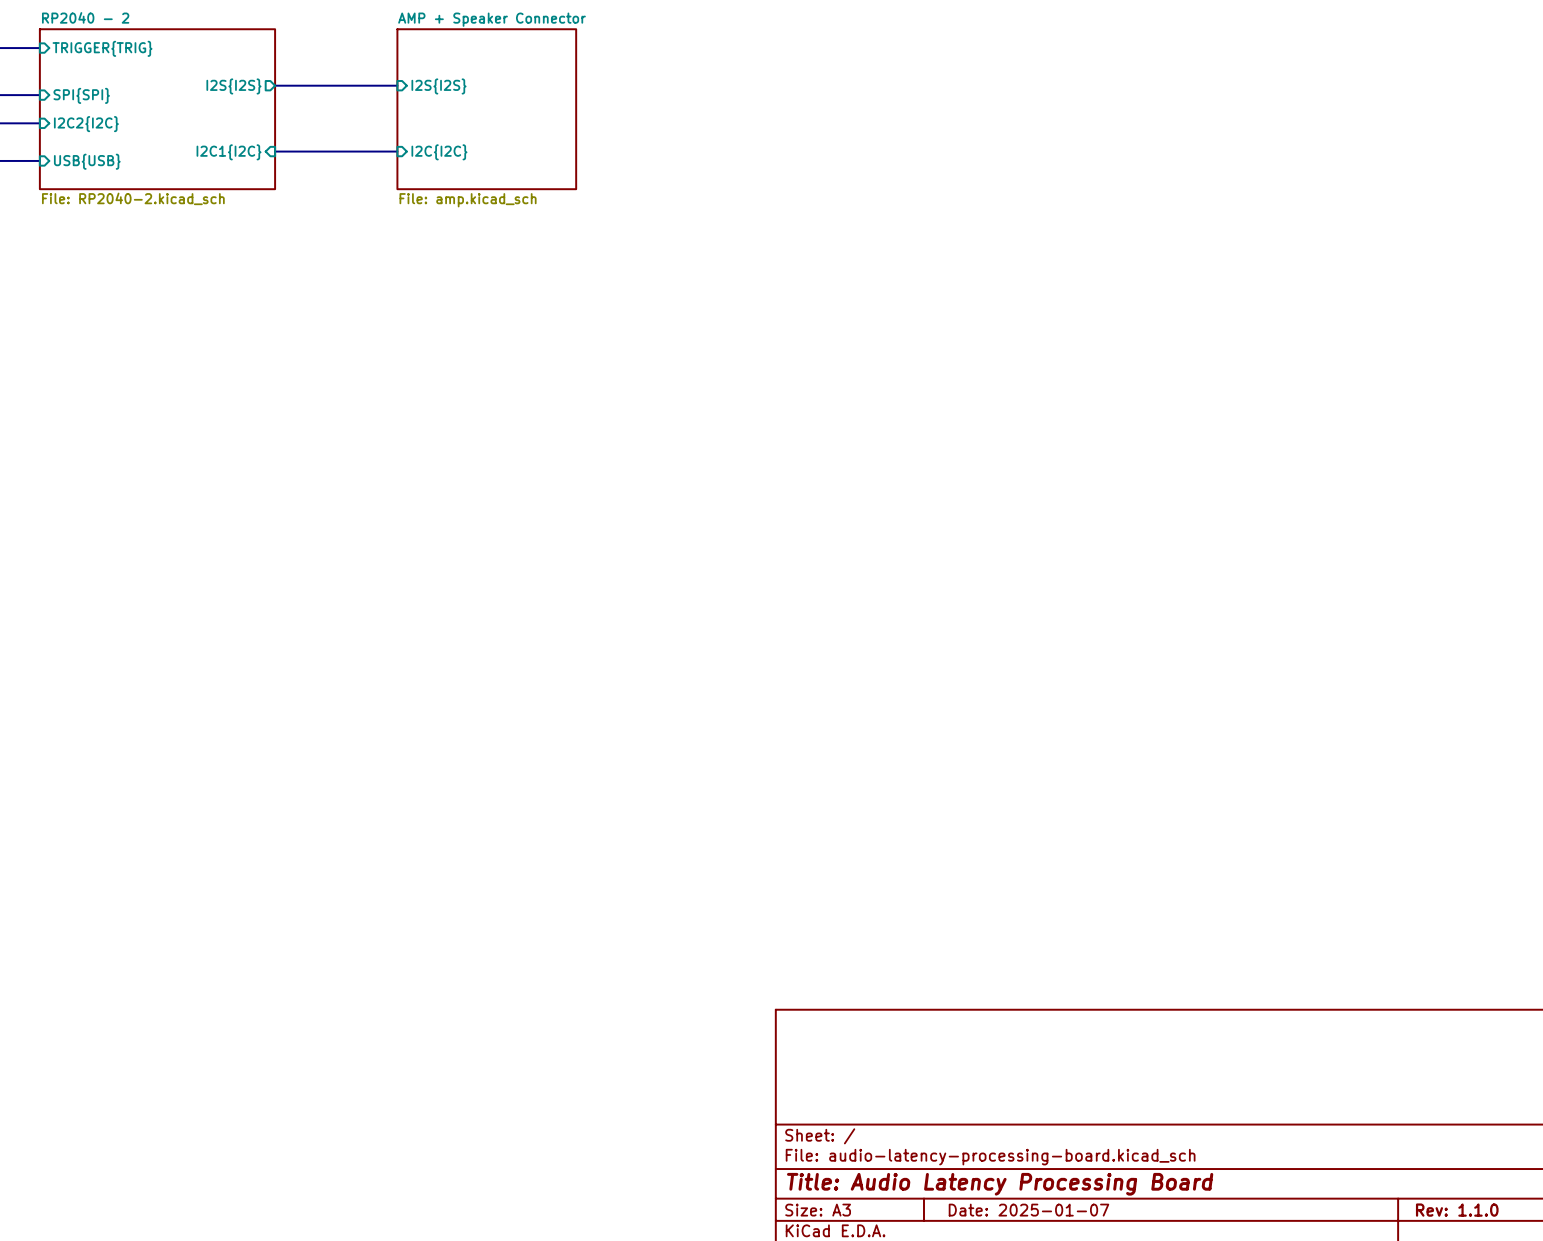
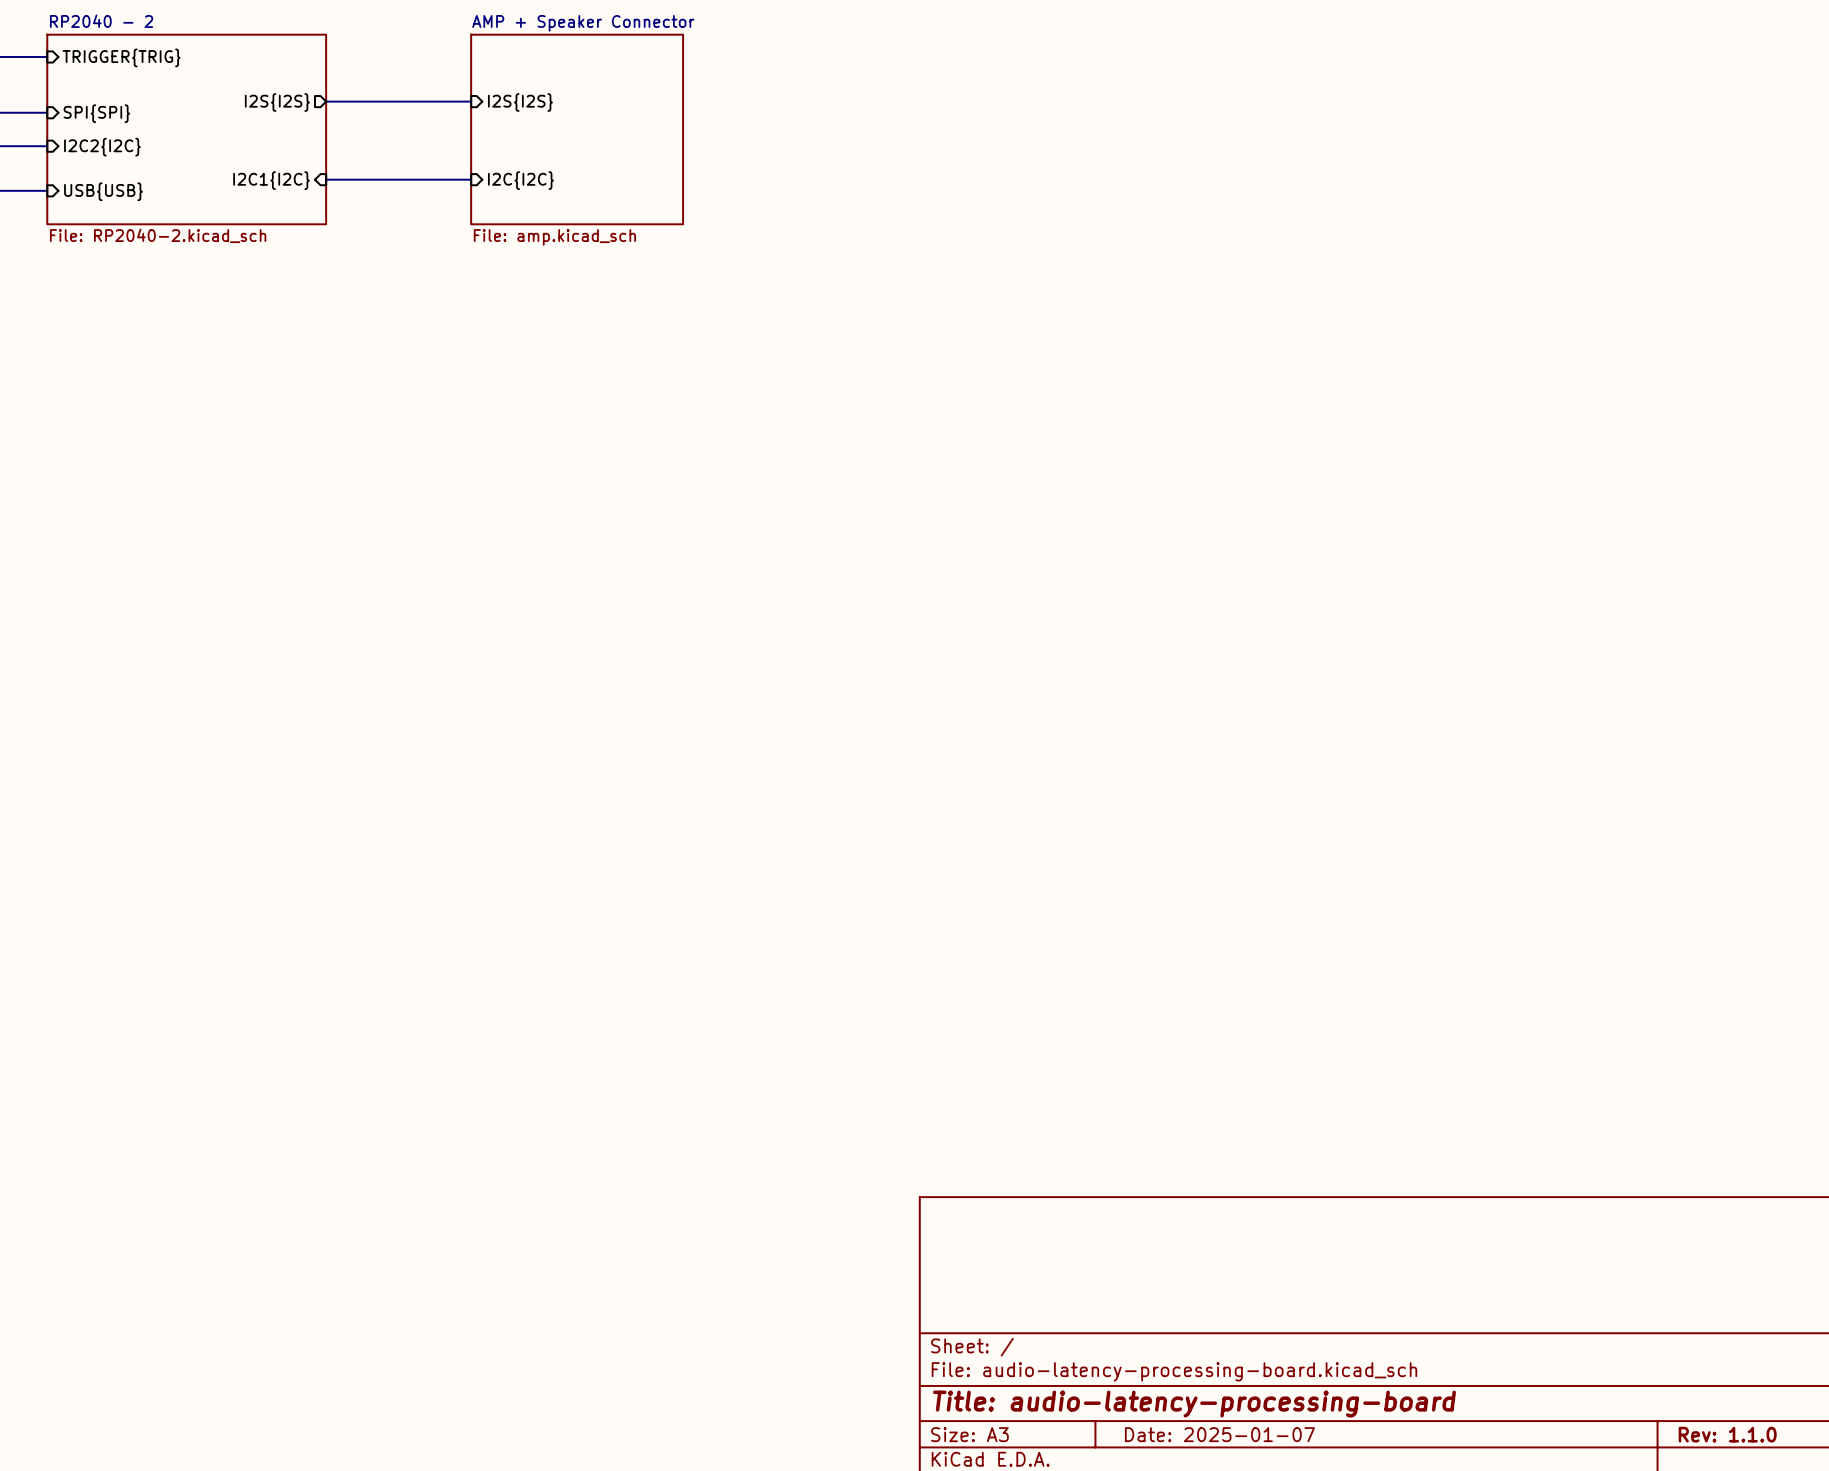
title block: Title: Audio Latency Processing Board (1000, 1184) -> Title: audio-latency-processing-board (1194, 1404)

